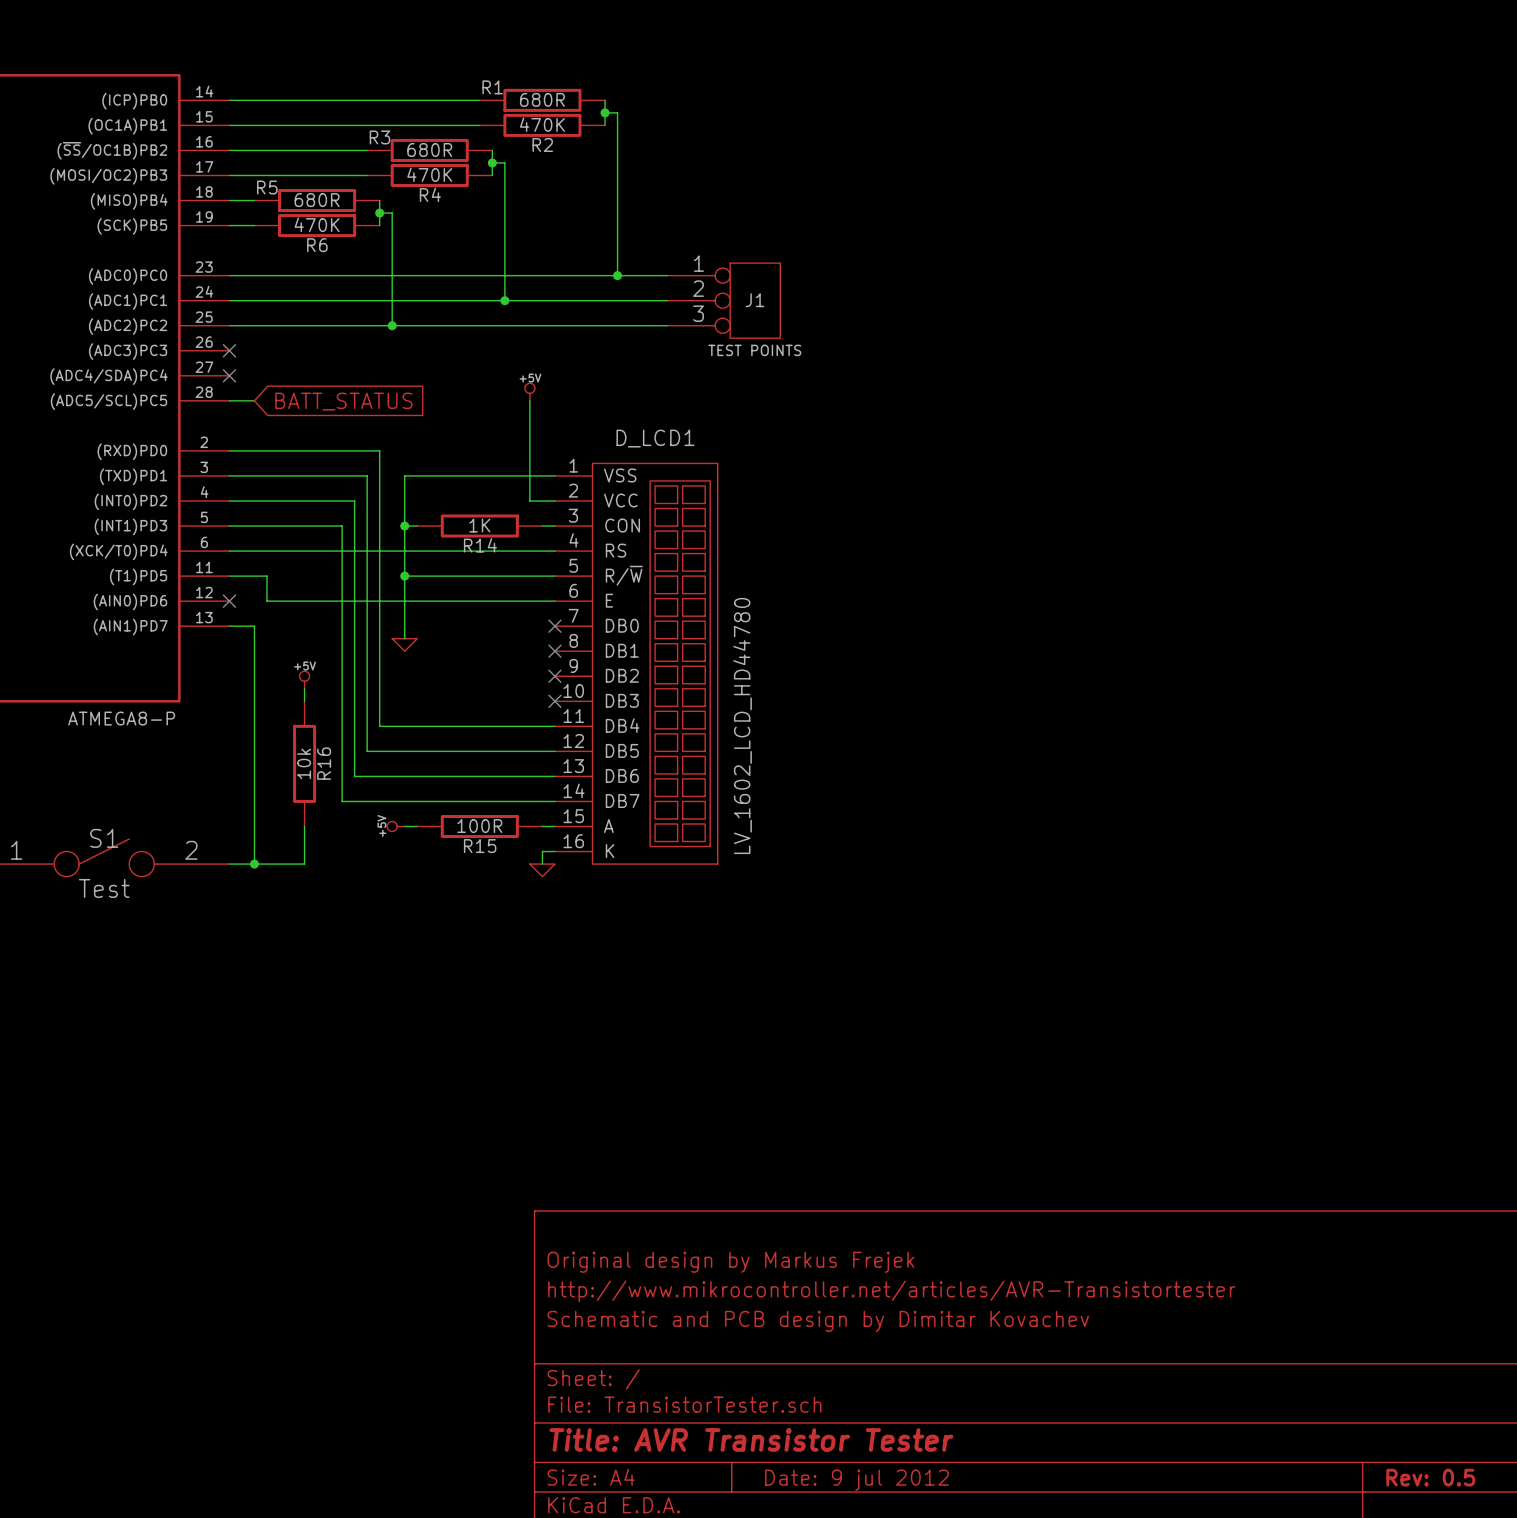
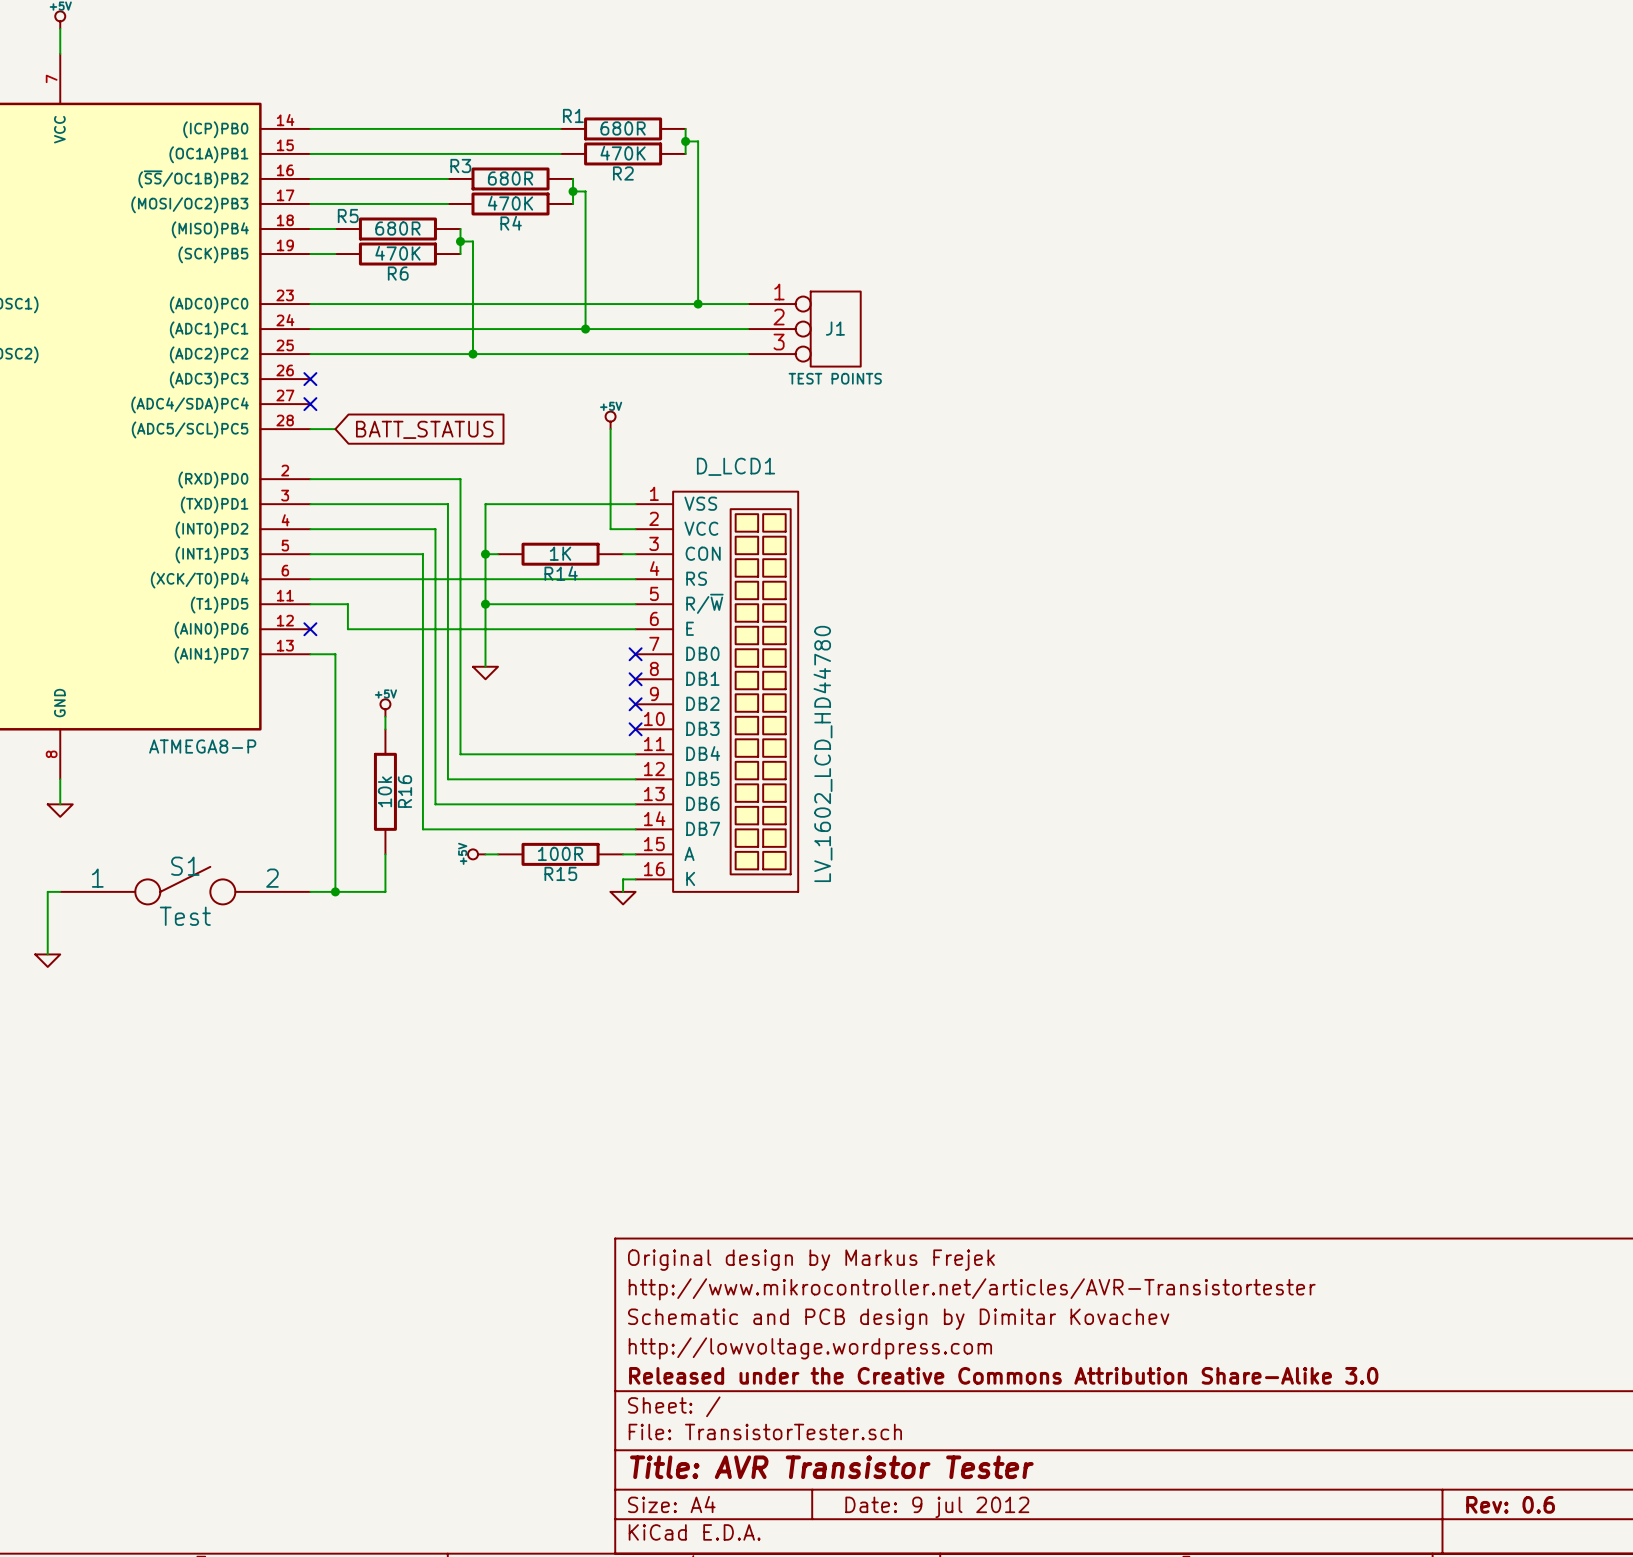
title block: none -> Original design by Markus Frejek (811, 1260)
title block: Original design by Markus Frejek (730, 1262) -> http://www.mikrocontroller.net/articles/AVR-Transistortester (972, 1289)
title block: http://www.mikrocontroller.net/articles/AVR-Transistortester (891, 1291) -> Schematic and PCB design by Dimitar Kovachev (898, 1319)
title block: Schematic and PCB design by Dimitar Kovachev (818, 1321) -> http://lowvoltage.wordpress.com (810, 1348)
title block: none -> Released under the Creative Commons Attribution Share-Alike 3.0 (1003, 1375)
title block: Rev: 0.5 (1430, 1477) -> Rev: 0.6 (1510, 1504)

